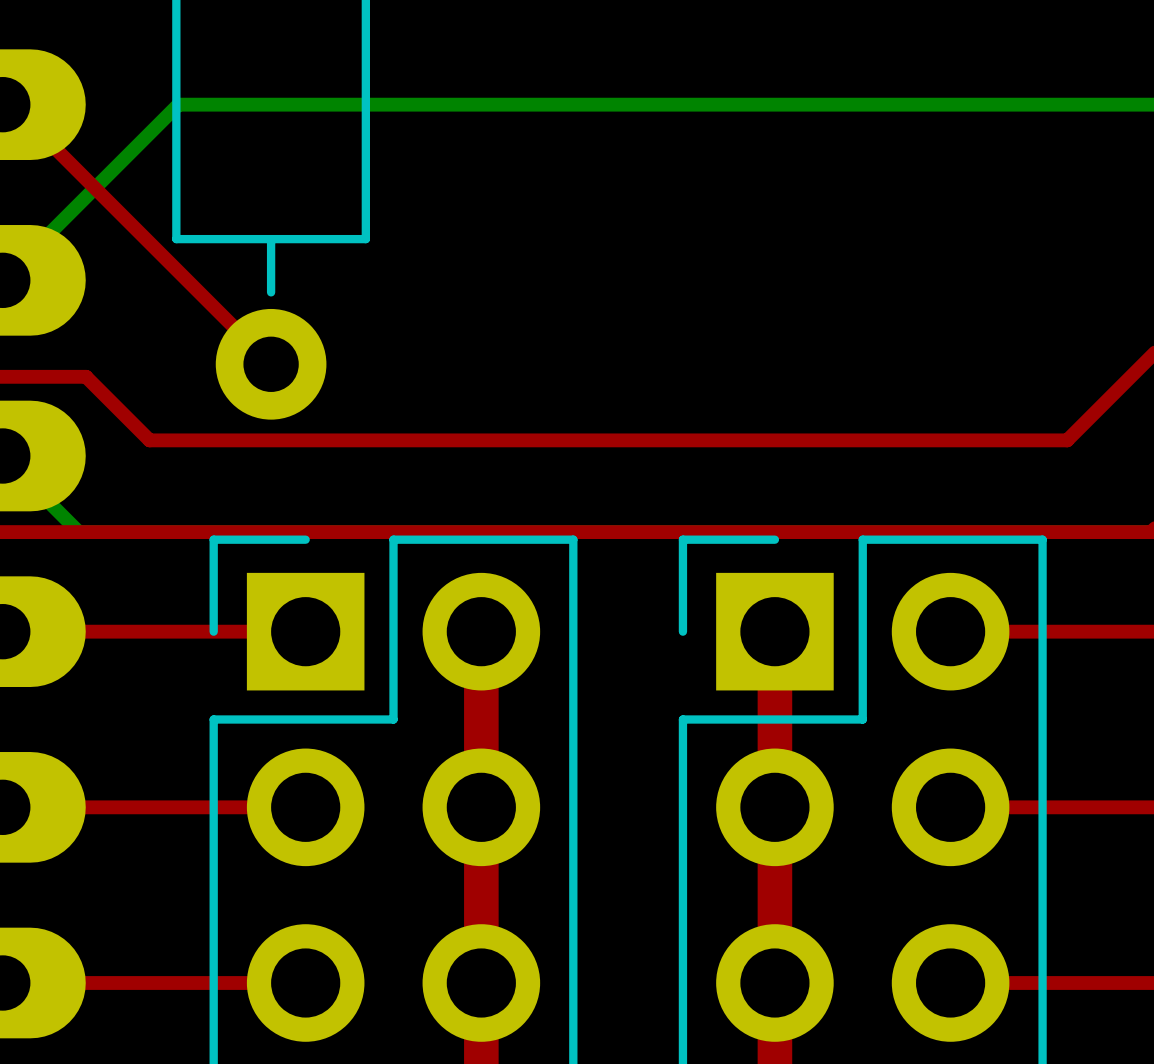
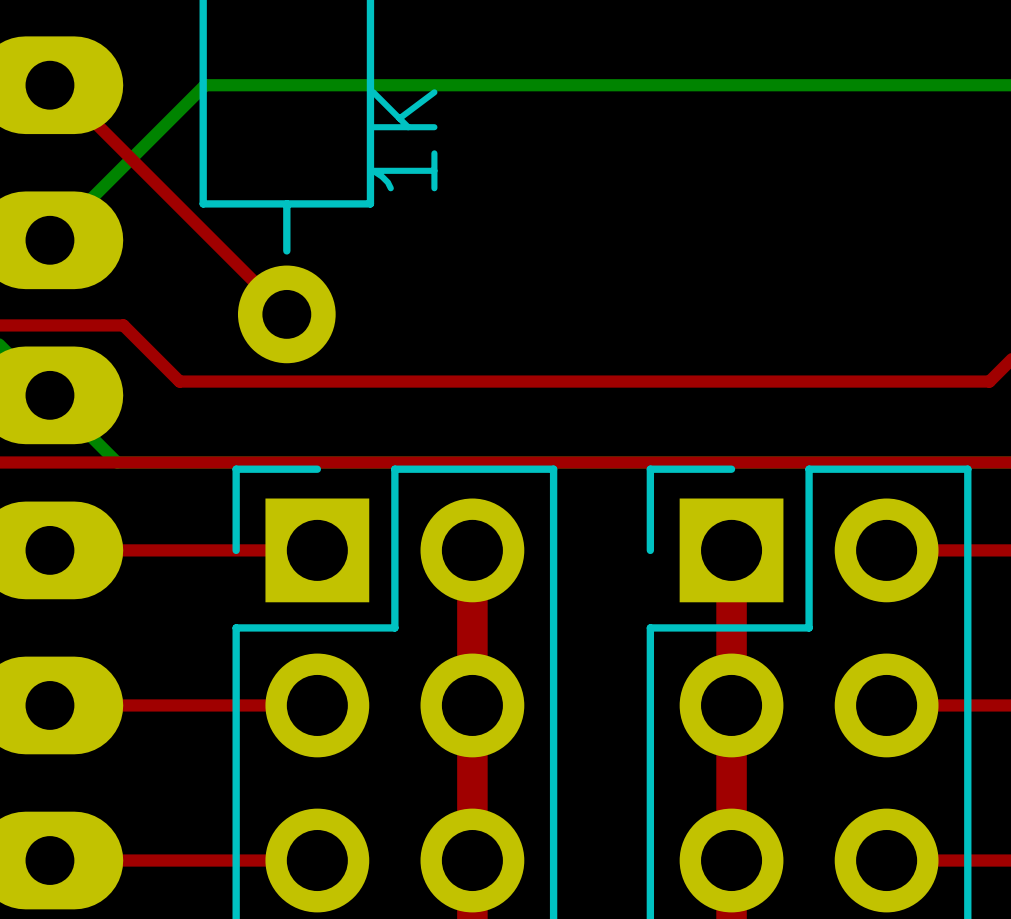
text: none -> 1K (403, 140)

